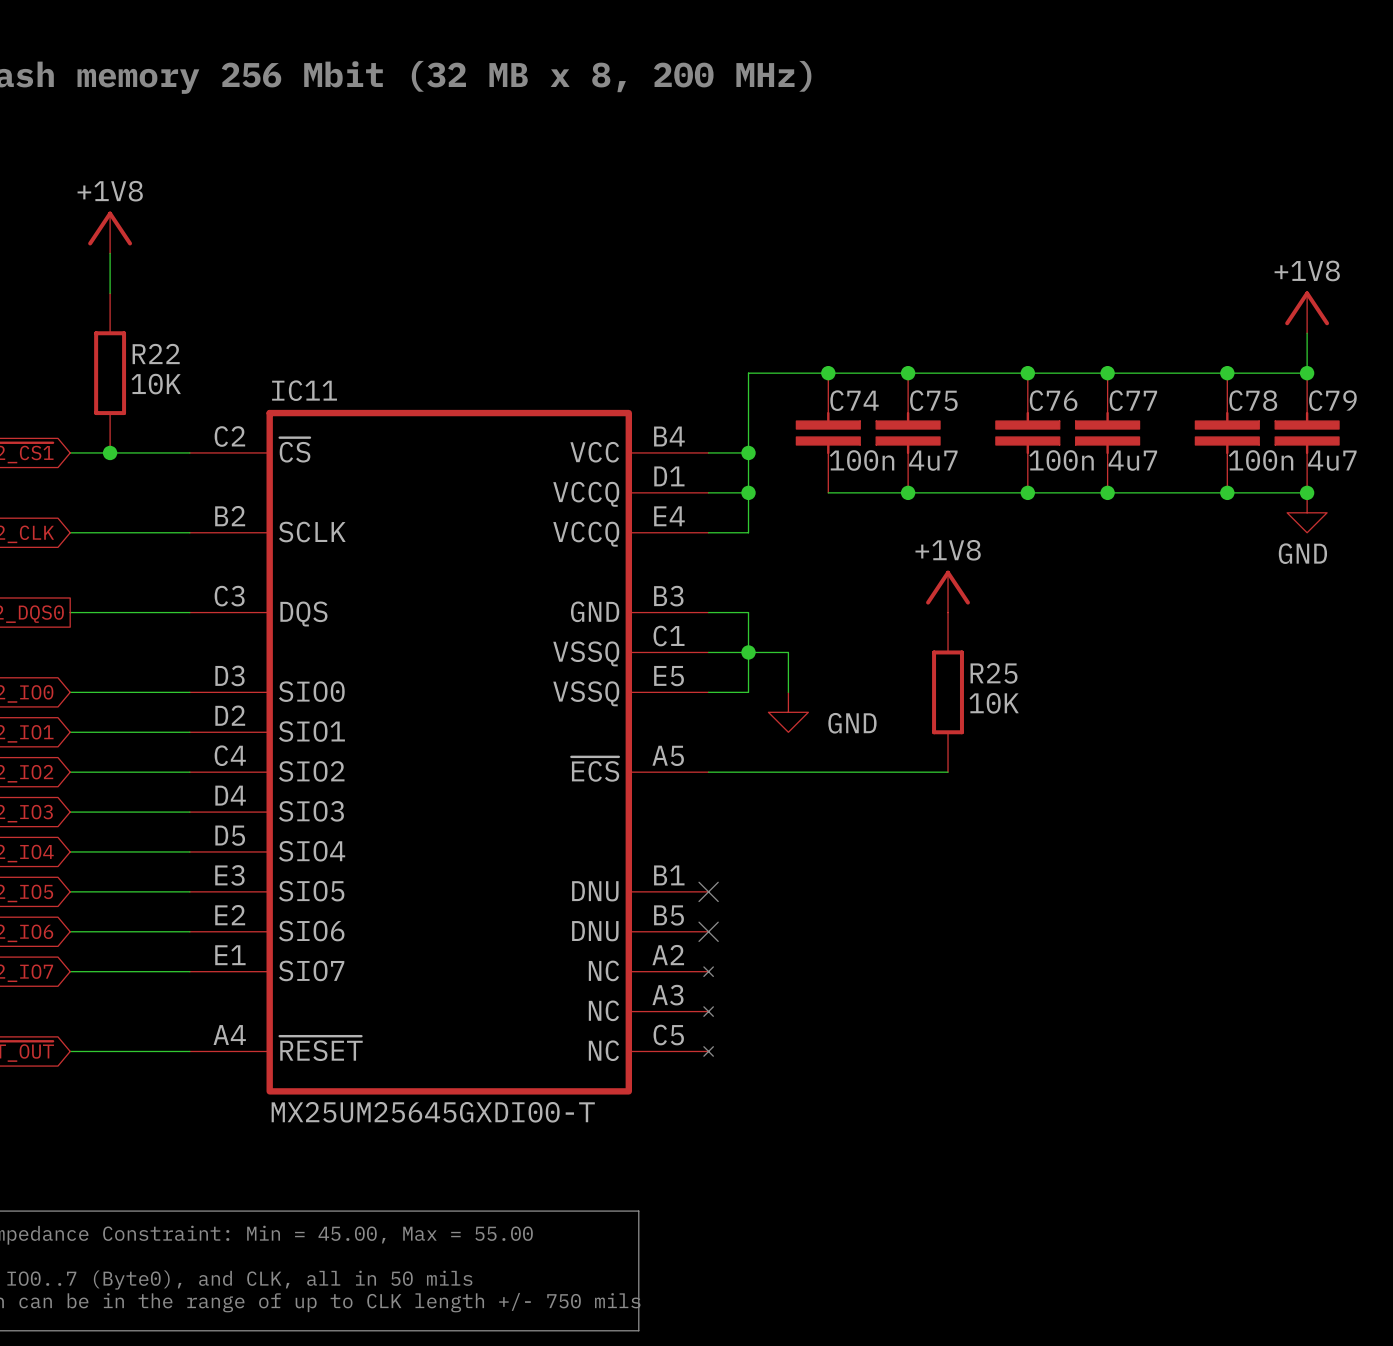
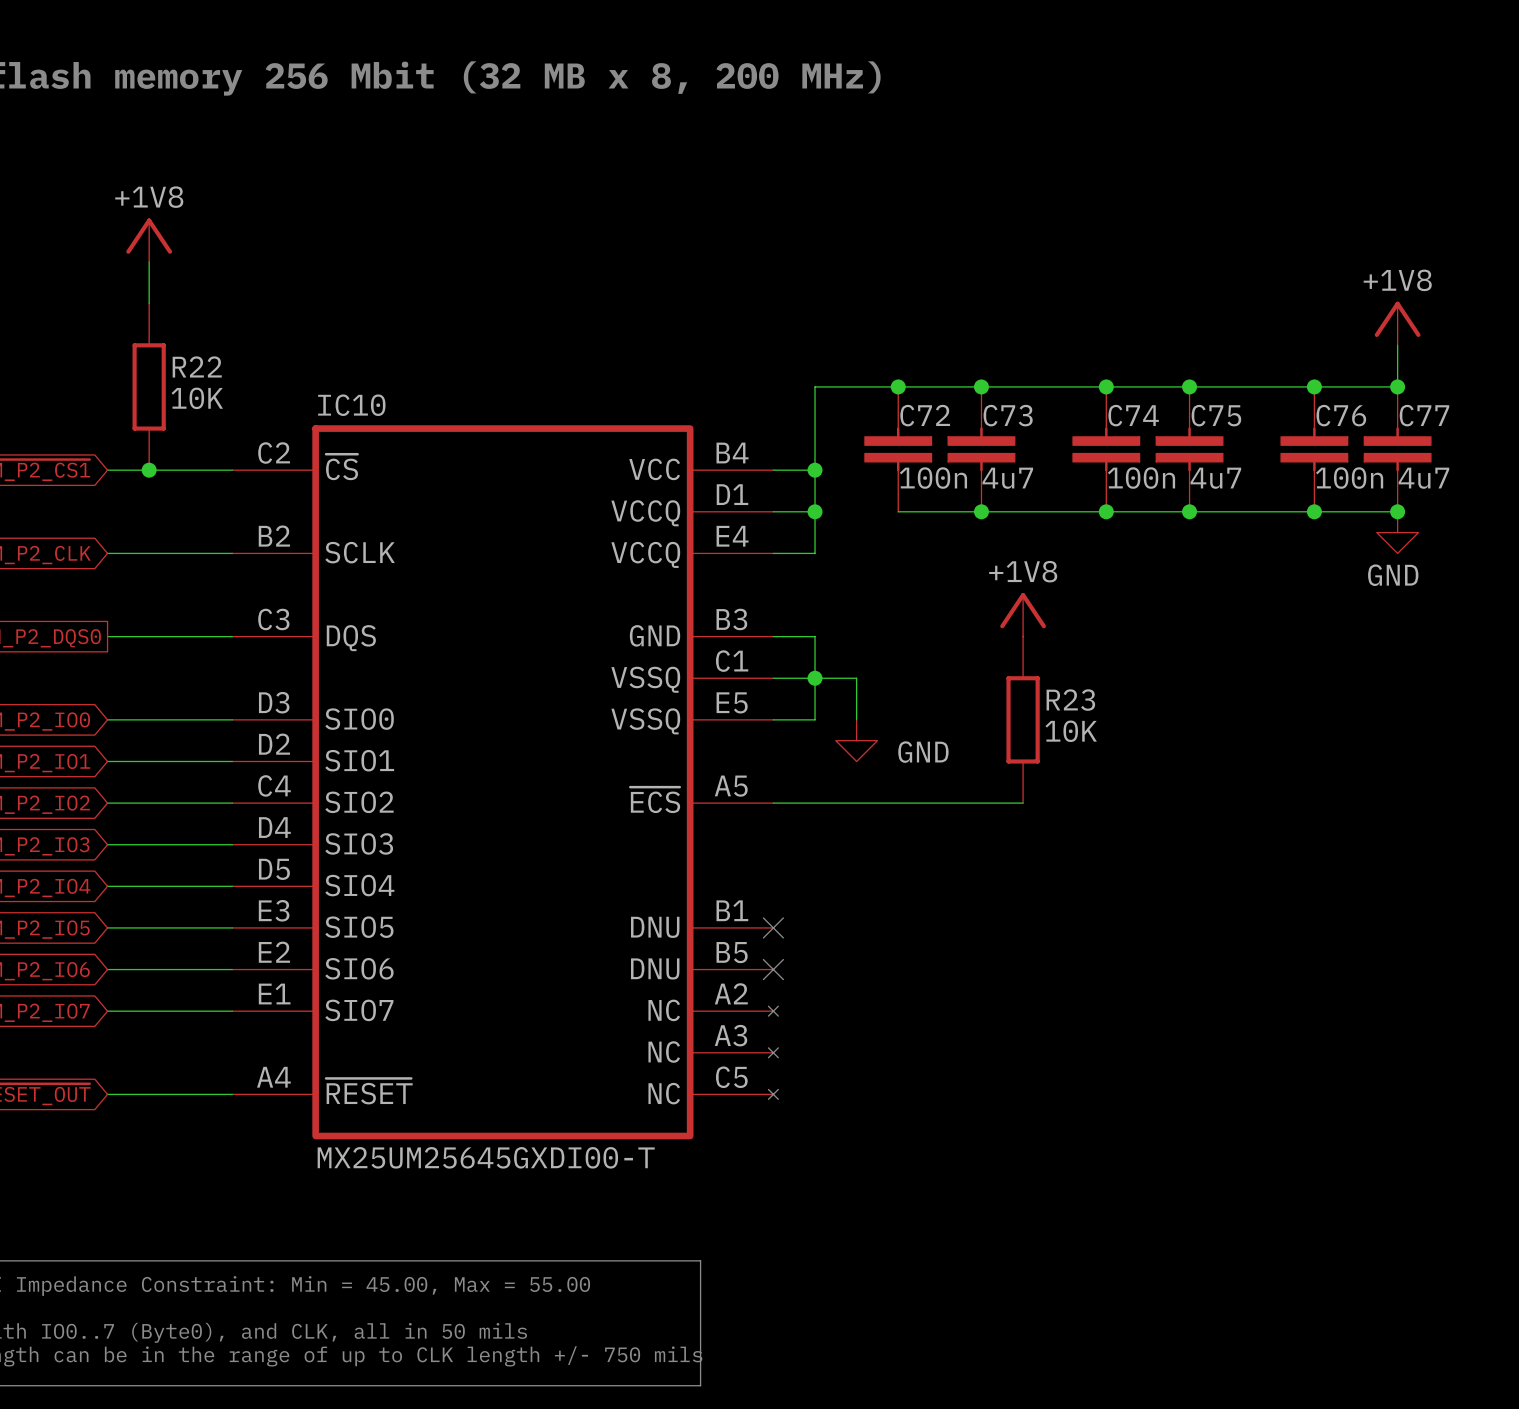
IC11 name: IC11 (304, 390) -> IC10 (351, 405)
C74 name: C74 (854, 400) -> C72 (925, 415)
C75 name: C75 (933, 400) -> C73 (1008, 415)
C76 name: C76 (1053, 400) -> C74 (1133, 415)
C77 name: C77 (1133, 400) -> C75 (1216, 415)
C78 name: C78 (1253, 400) -> C76 (1341, 415)
C79 name: C79 (1332, 400) -> C77 (1424, 415)
R25 name: R25 (994, 673) -> R23 (1070, 700)

